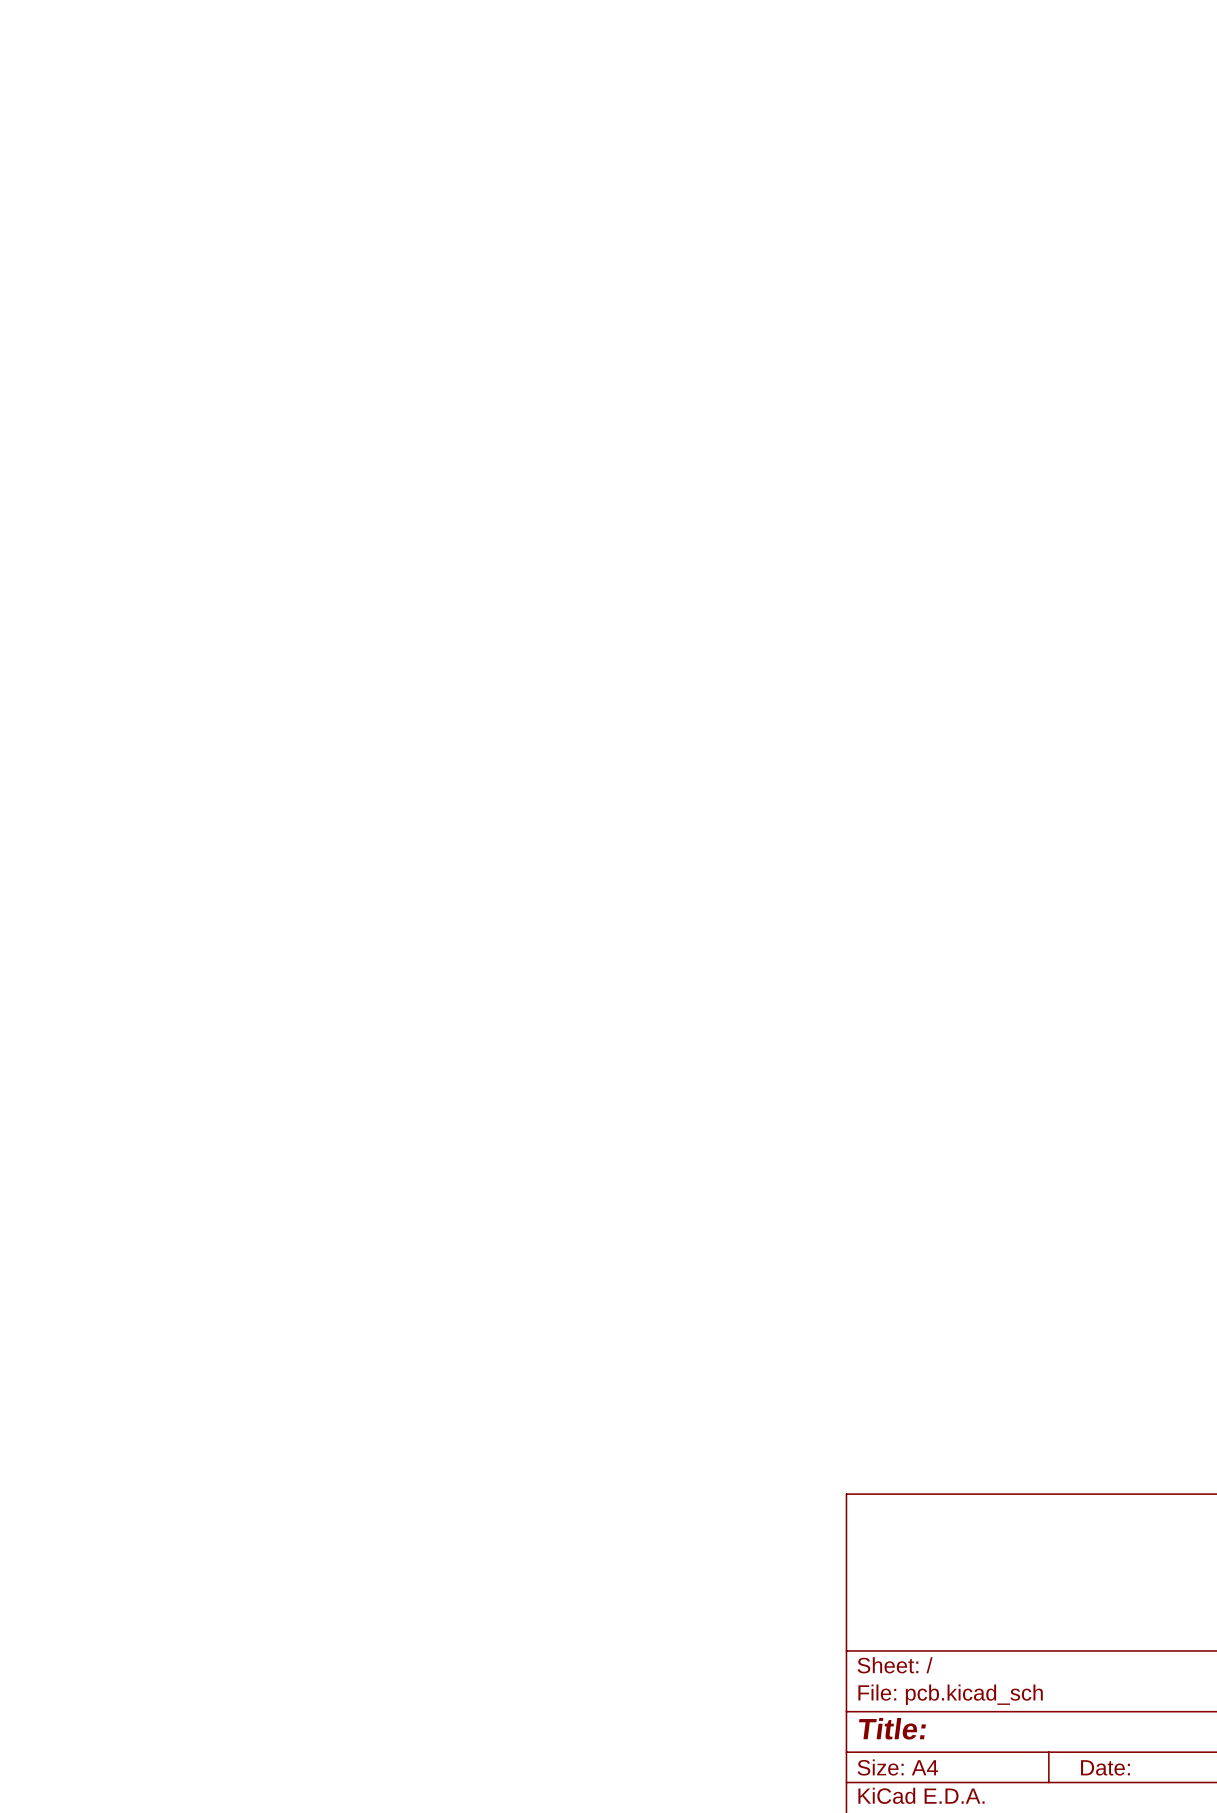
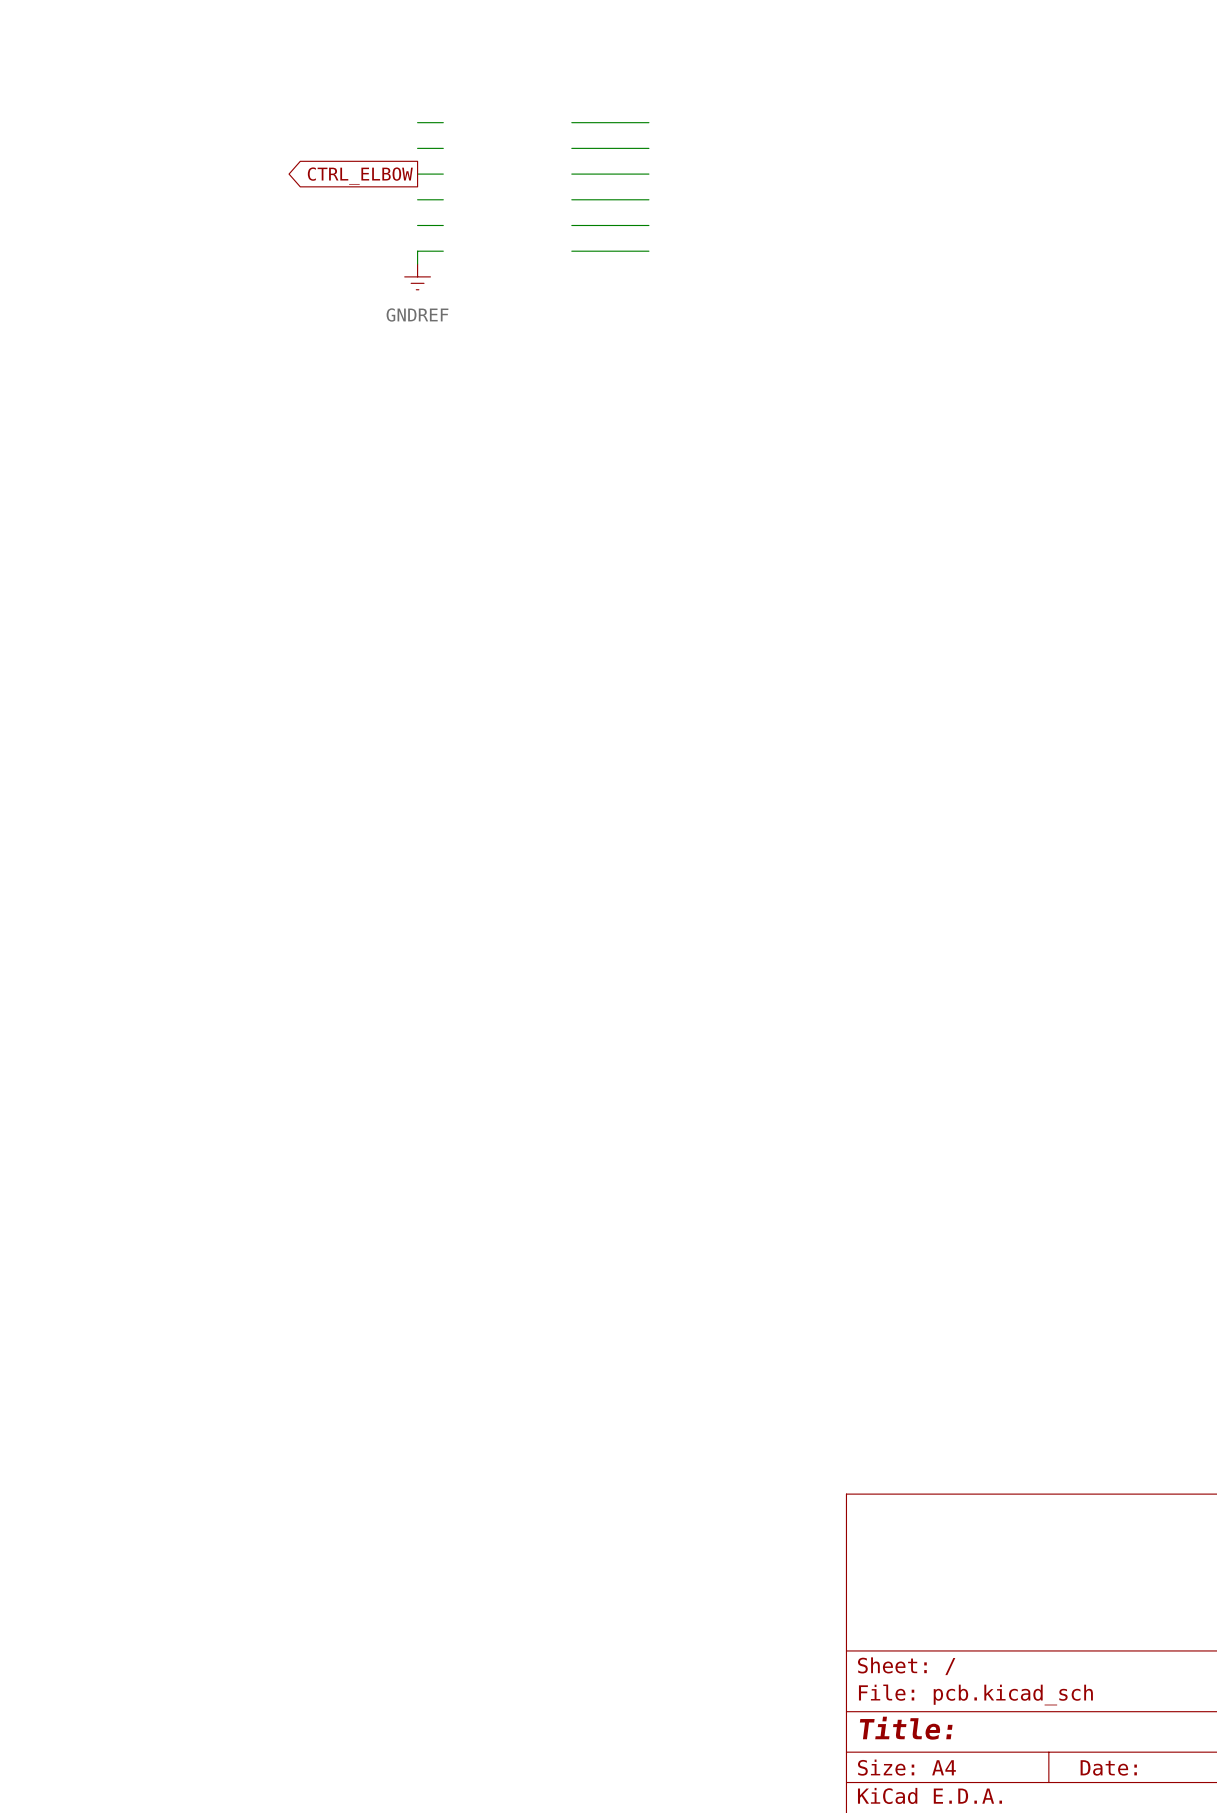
wire: none -> (417, 122) (443, 122)
wire: none -> (571, 122) (648, 122)
wire: none -> (417, 148) (443, 148)
wire: none -> (571, 148) (648, 148)
wire: none -> (417, 174) (443, 174)
wire: none -> (571, 174) (648, 174)
global label: none -> CTRL_ELBOW (360, 176)
wire: none -> (417, 199) (443, 199)
wire: none -> (571, 199) (648, 199)
wire: none -> (417, 225) (443, 225)
wire: none -> (571, 225) (648, 225)
wire: none -> (443, 251) (417, 251) (417, 264)
wire: none -> (571, 251) (648, 251)
power symbol: none -> GNDREF (417, 276)

